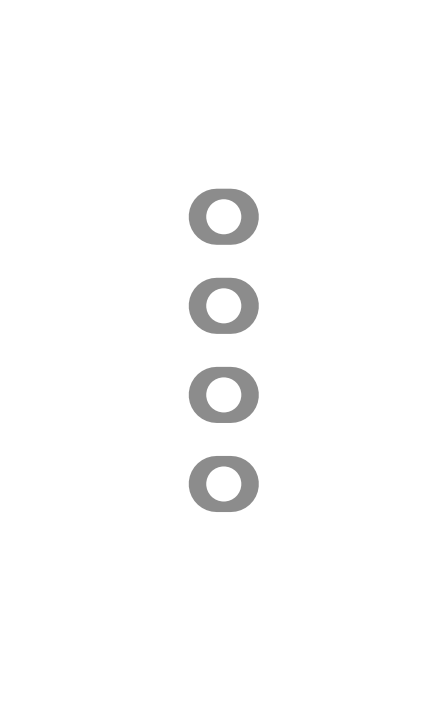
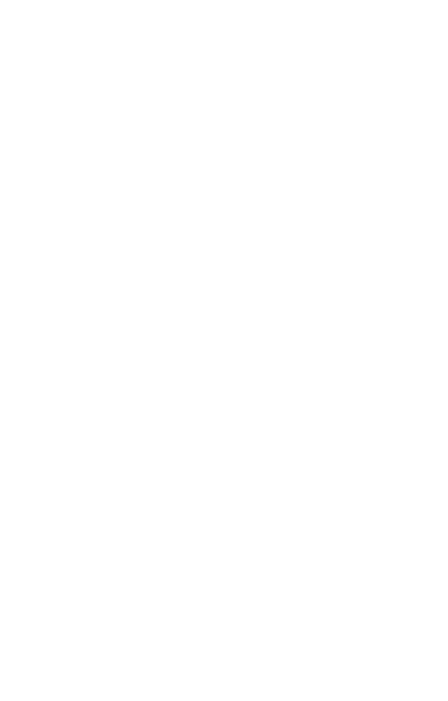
part: (223, 350) -> none

